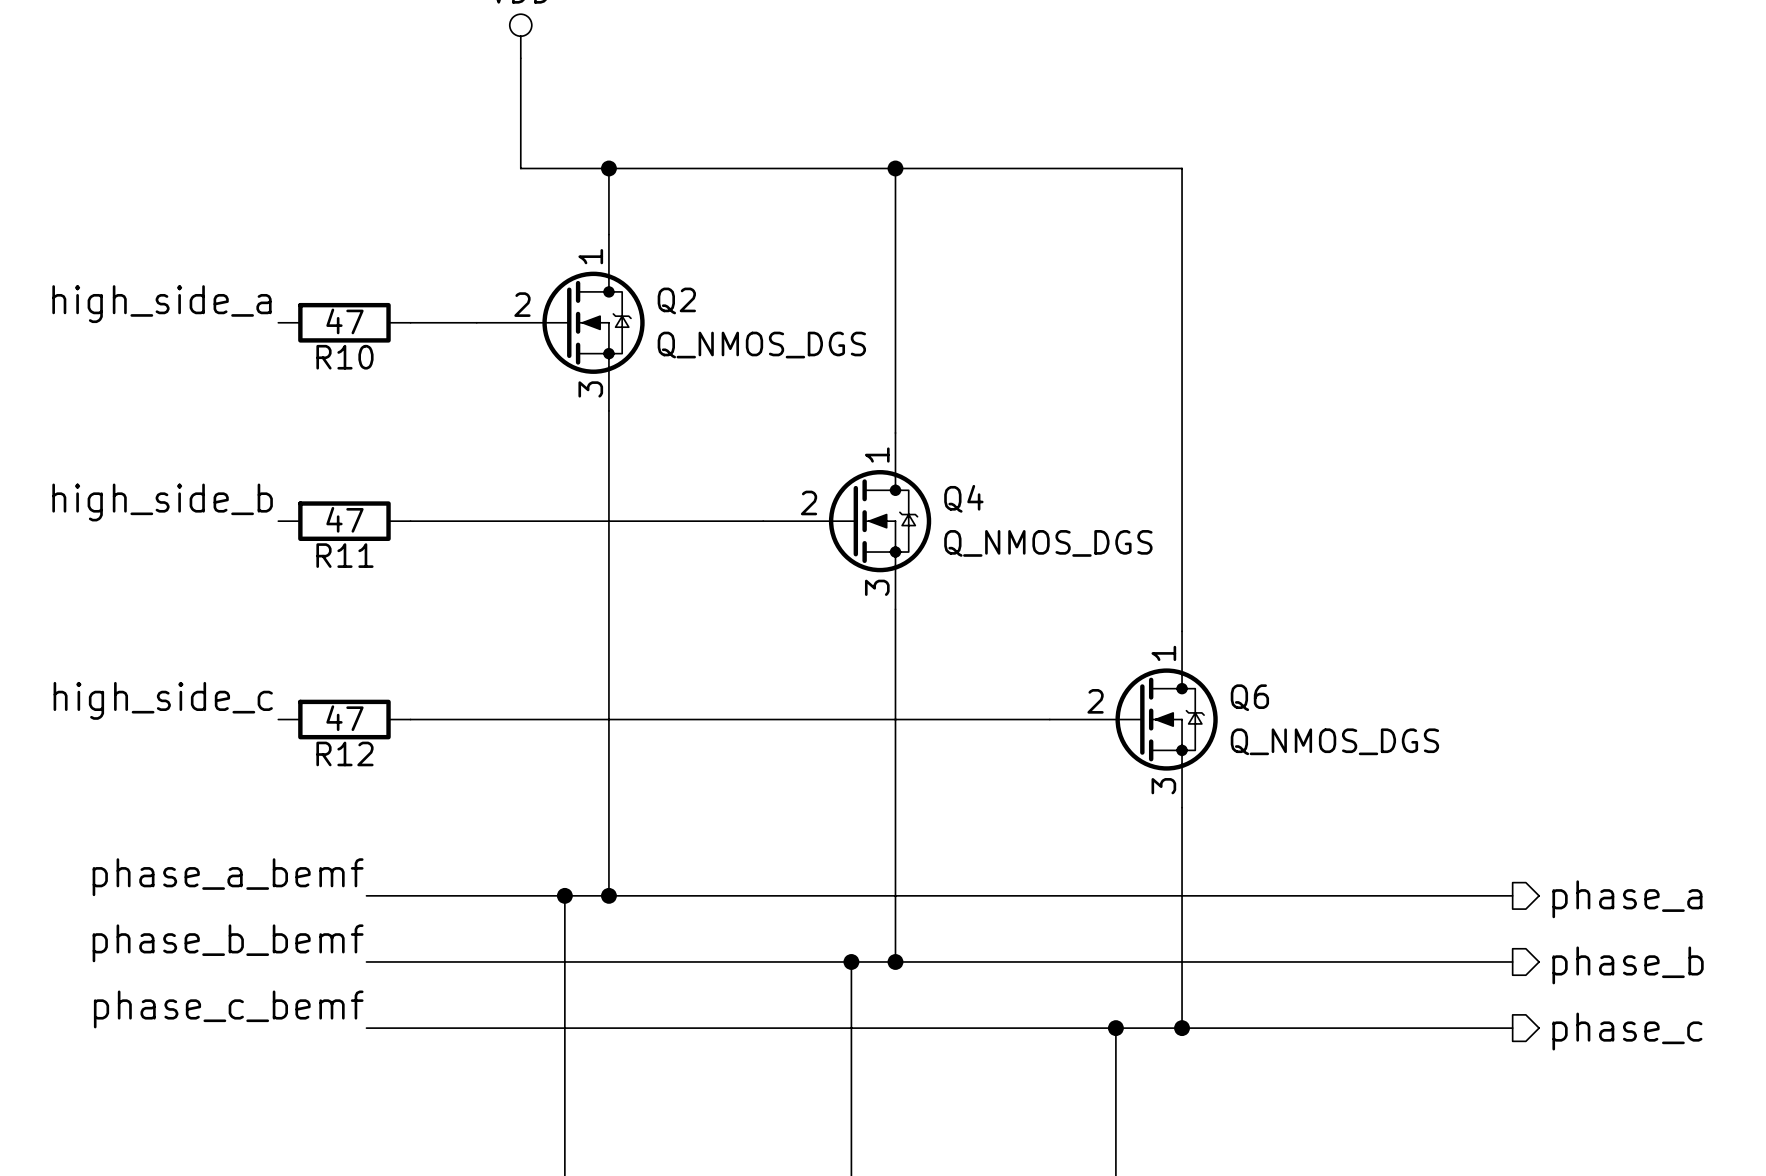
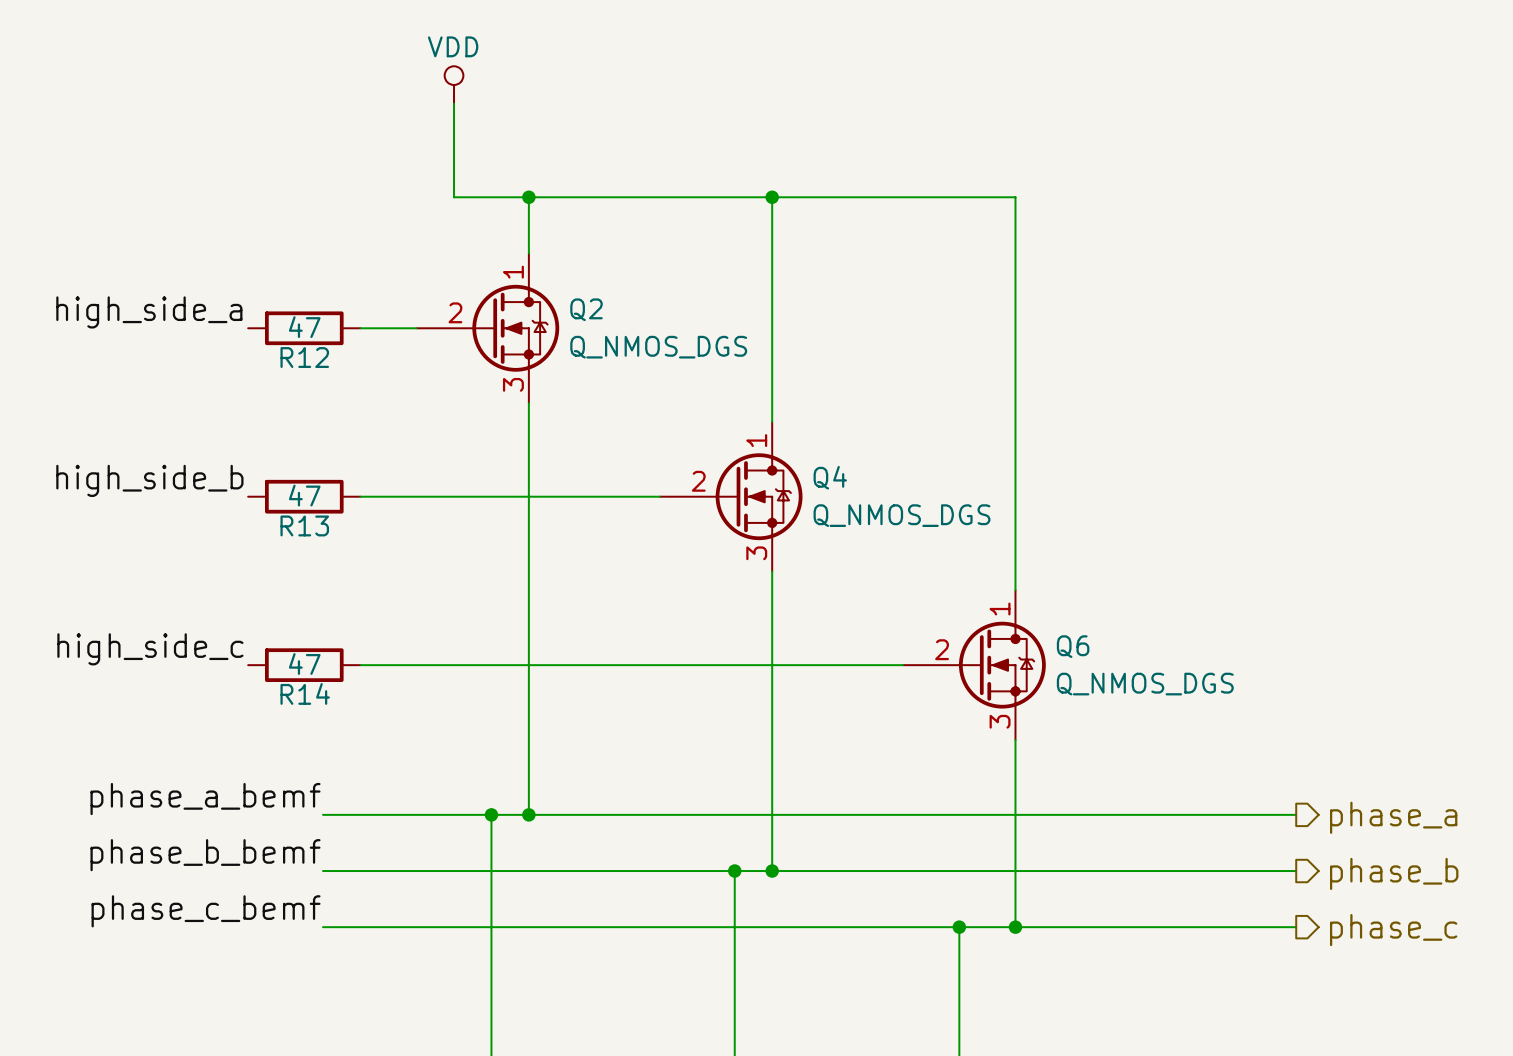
R10 name: R10 (344, 357) -> R12 (304, 357)
R11 name: R11 (344, 555) -> R13 (304, 525)
R12 name: R12 (344, 753) -> R14 (305, 693)

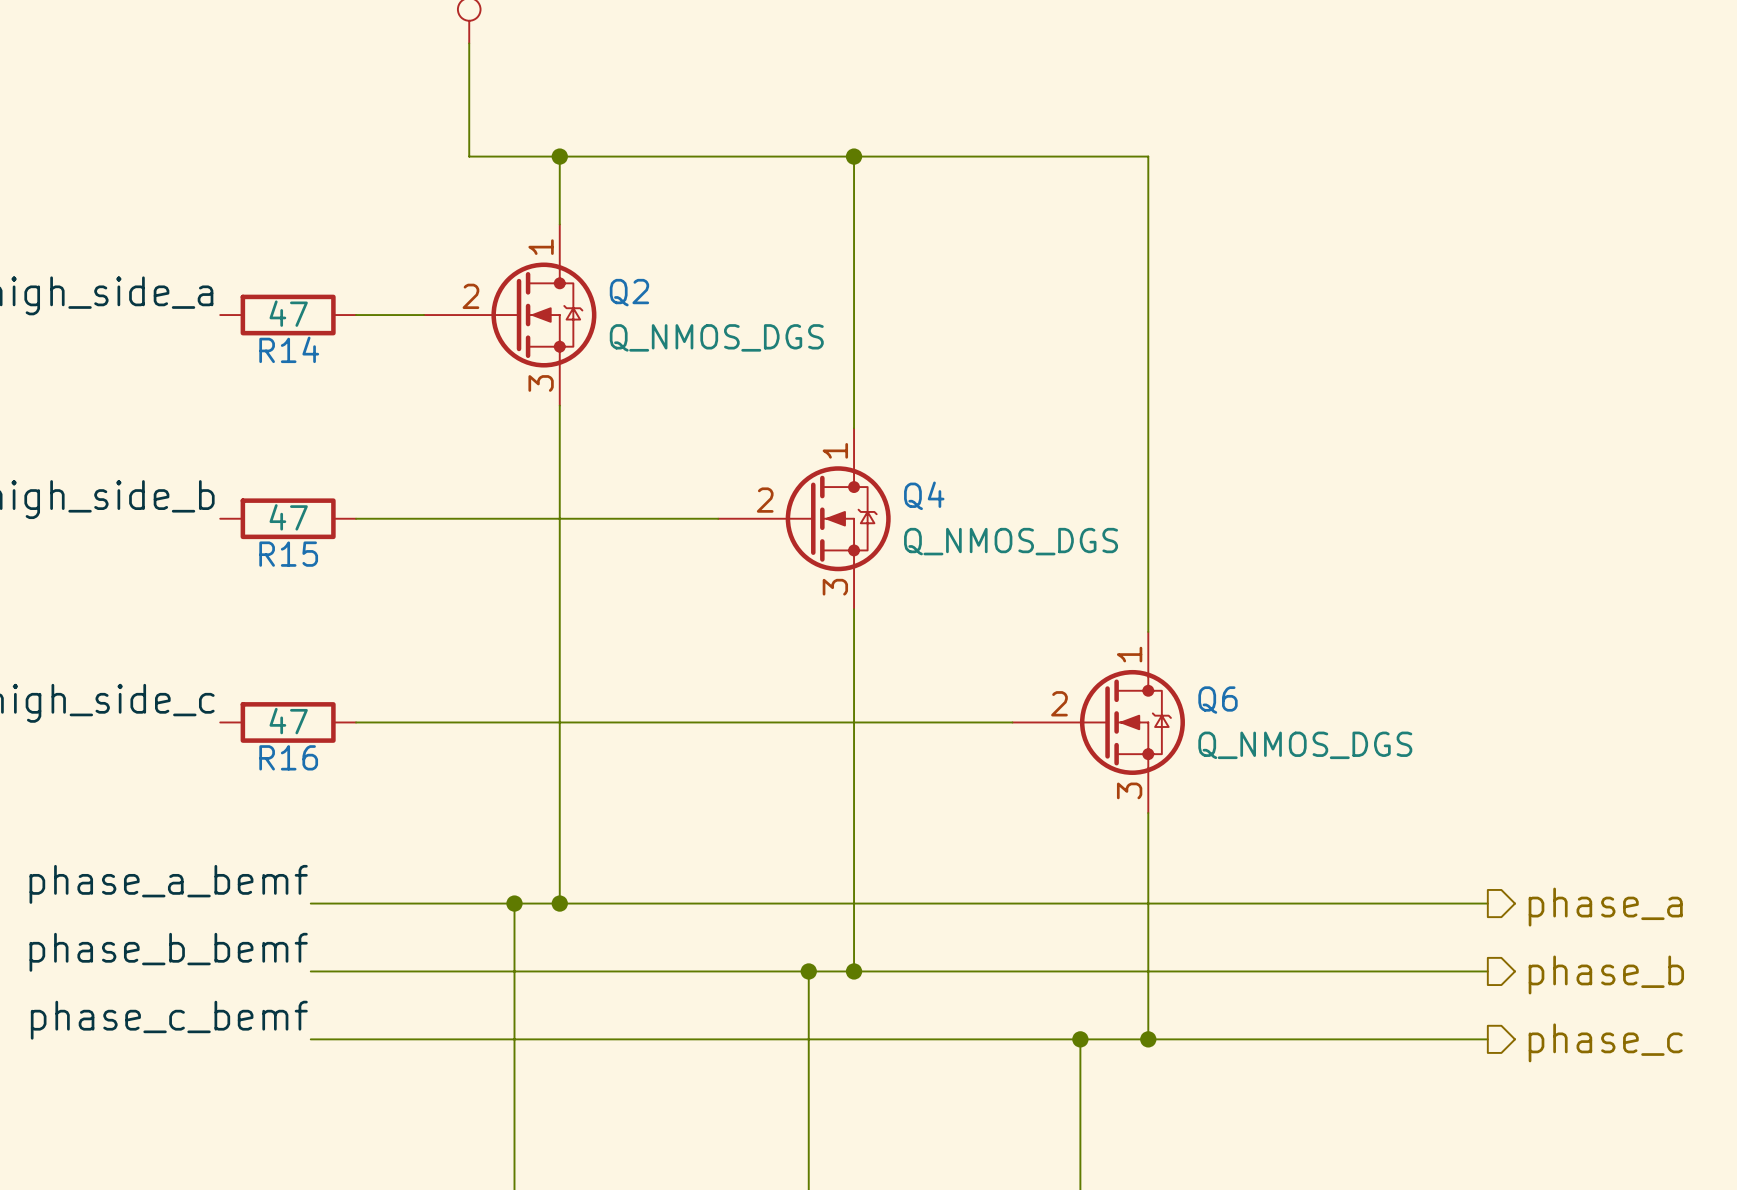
R12 name: R12 (304, 357) -> R14 (289, 349)
R13 name: R13 (304, 525) -> R15 (288, 554)
R14 name: R14 (305, 693) -> R16 (288, 757)

